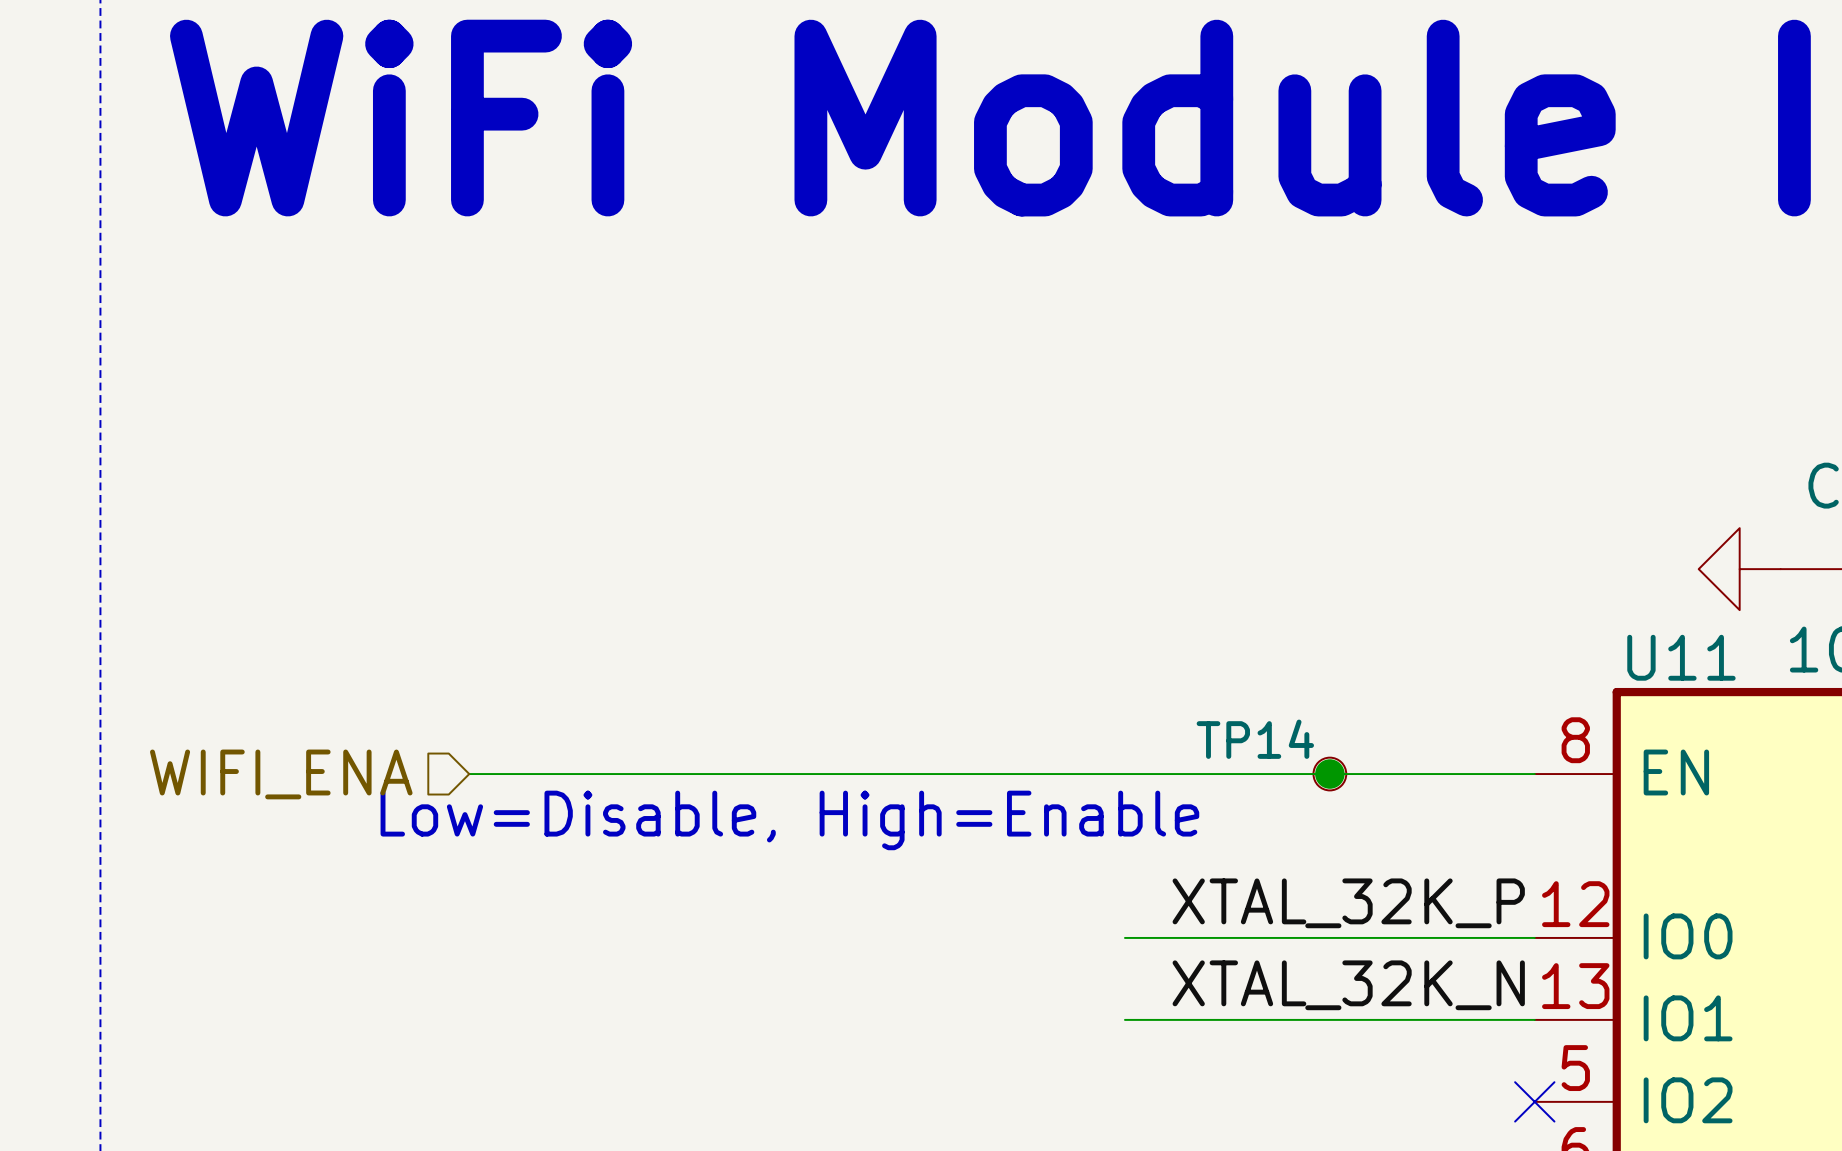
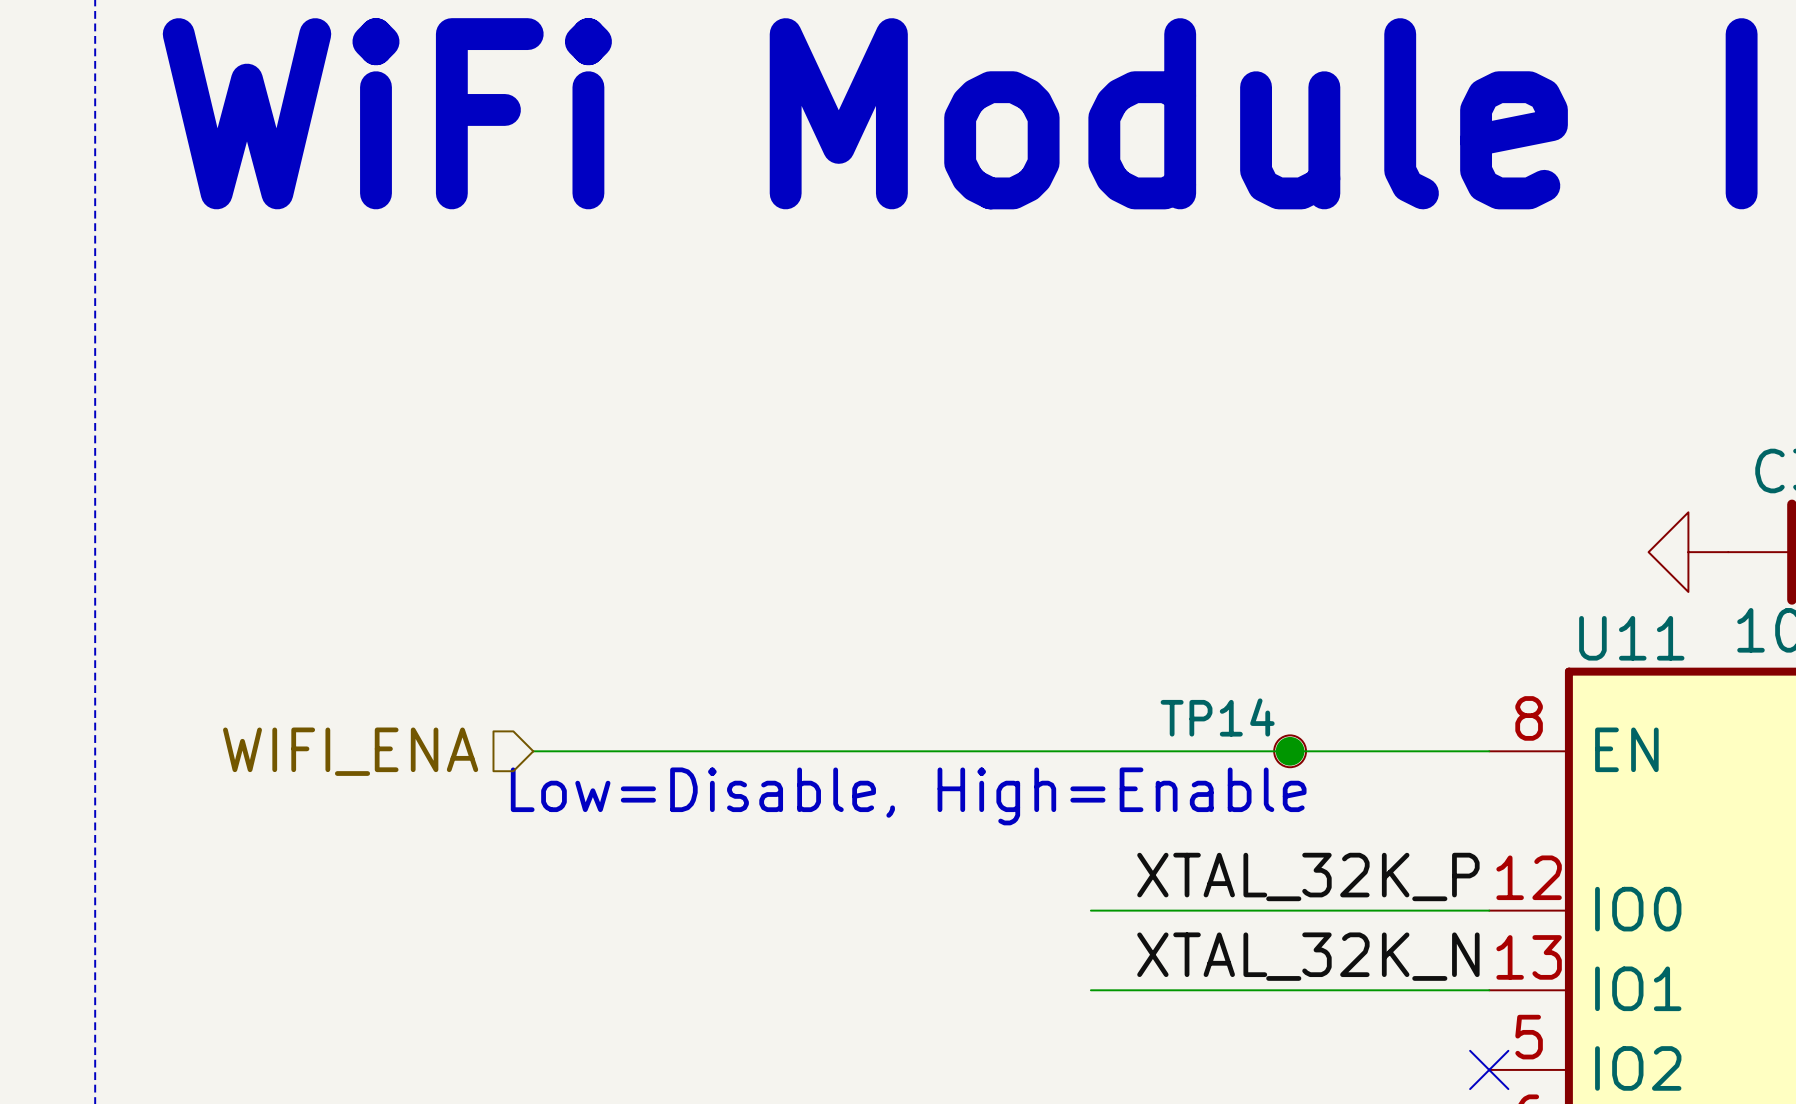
hierarchical label position: WIFI_ENA (281, 774) -> WIFI_ENA (350, 751)
wire: (469, 774) (551, 774) -> none
text position: Low=Disable, High=Enable (789, 820) -> Low=Disable, High=Enable (908, 796)

